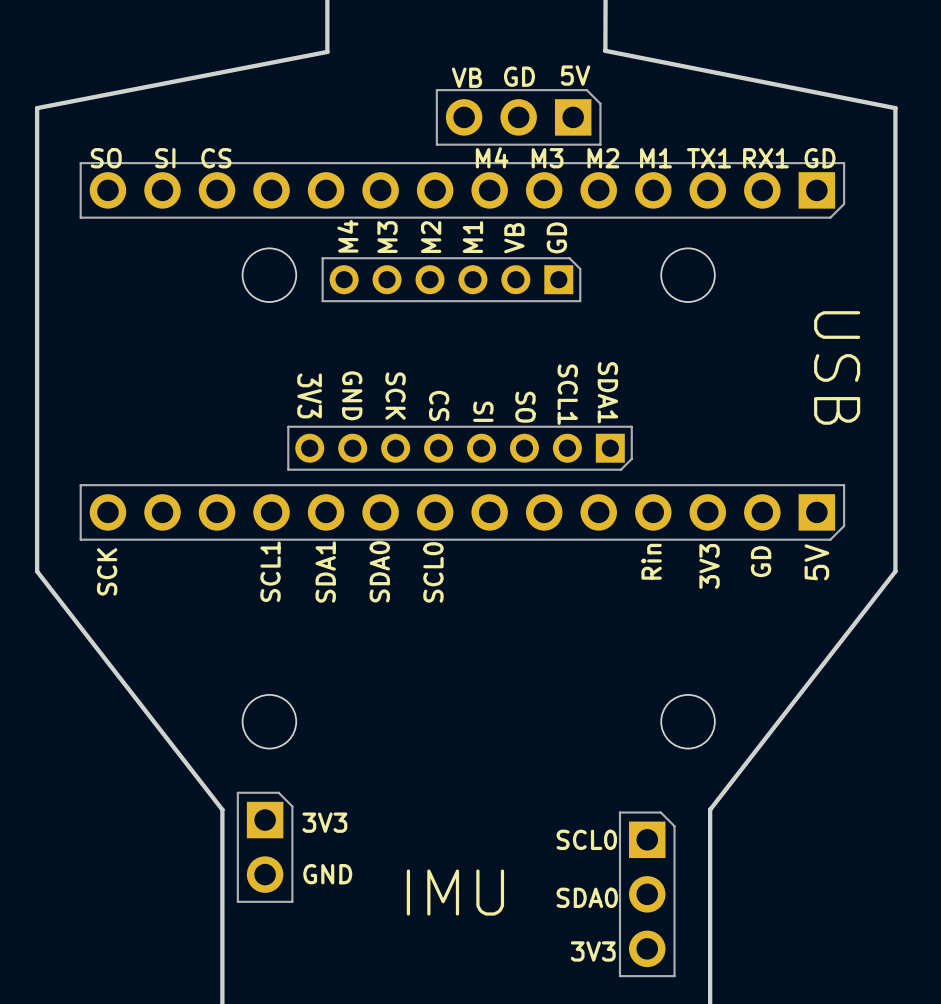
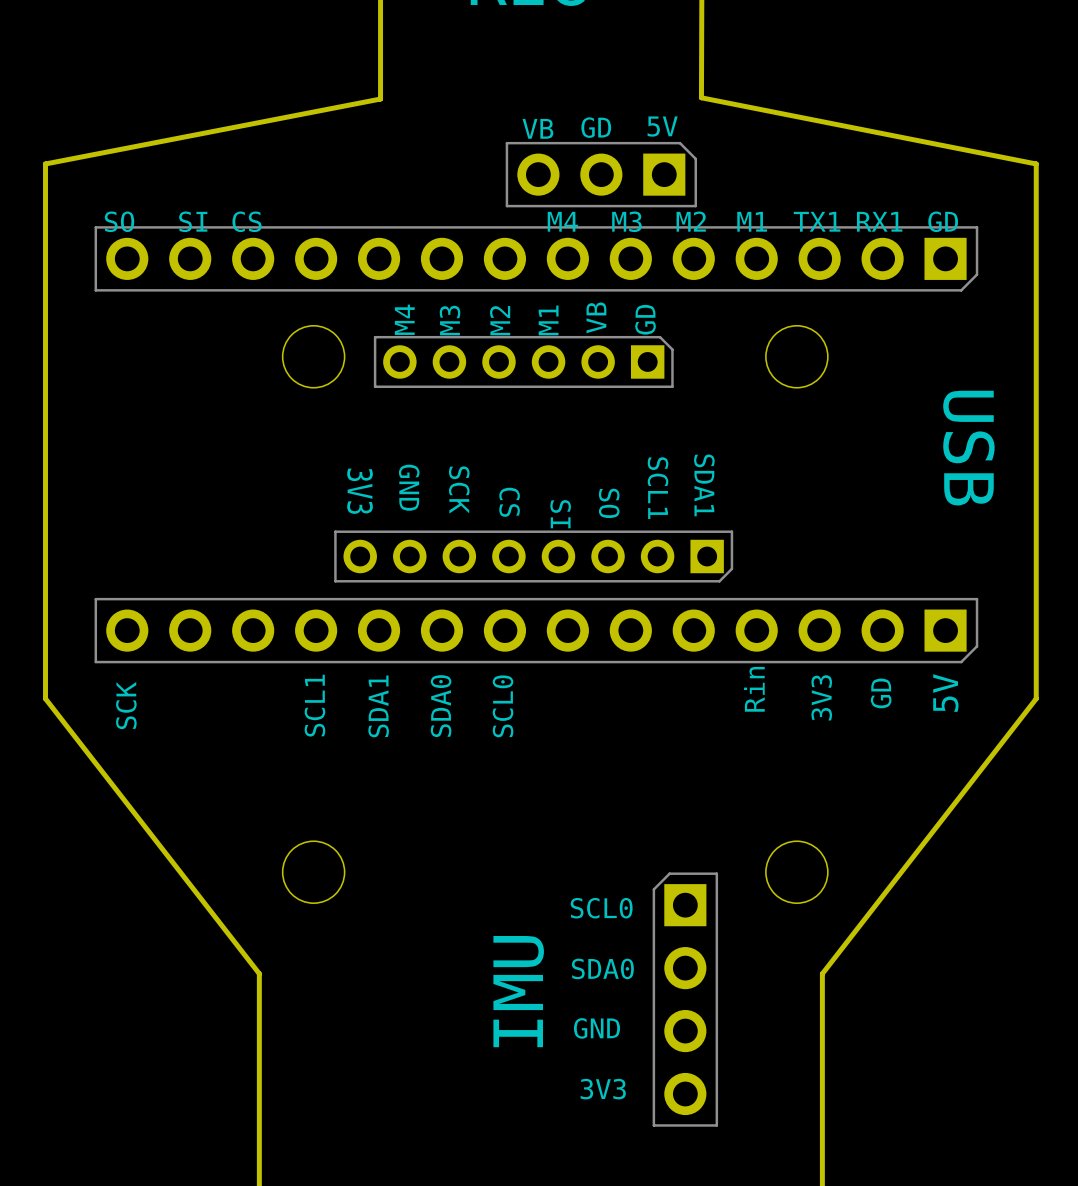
text: 3V3 (324, 822) -> none
part: none -> (685, 999)
text position: SCL0 (586, 839) -> SCL0 (601, 908)
part: (265, 847) -> none
text position: GND (327, 874) -> GND (596, 1028)
text rotation: 0° (455, 892) -> 90° counterclockwise (518, 991)
part: (647, 894) -> none
text position: SDA0 (587, 897) -> SDA0 (602, 968)
text position: 3V3 (593, 951) -> 3V3 (603, 1089)

